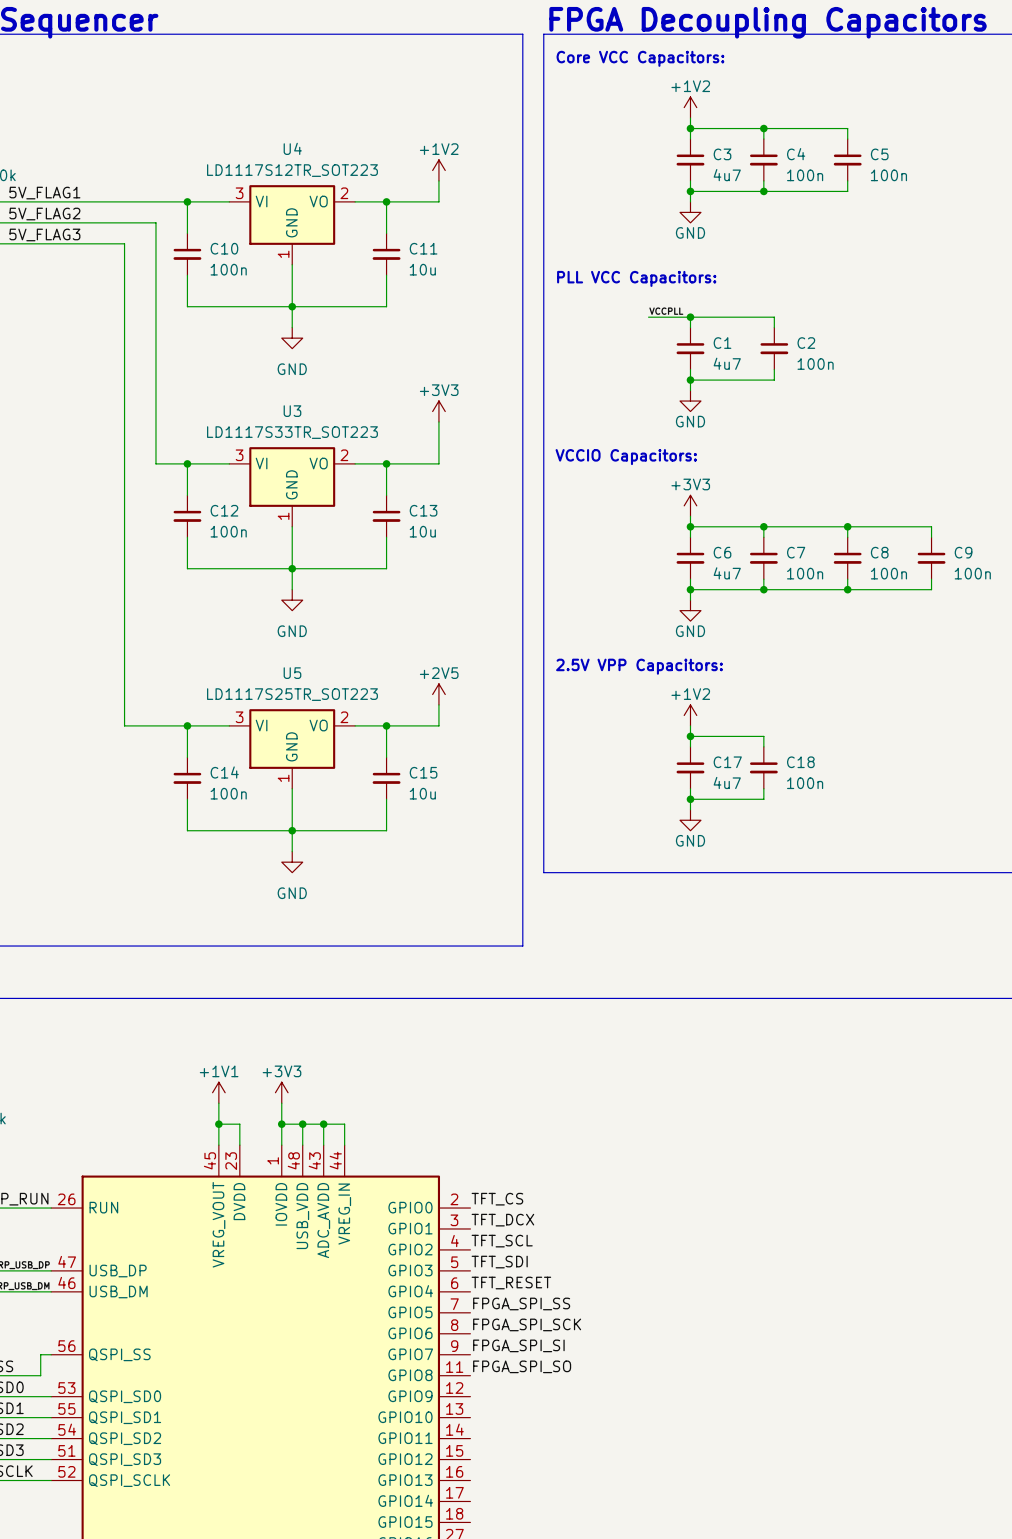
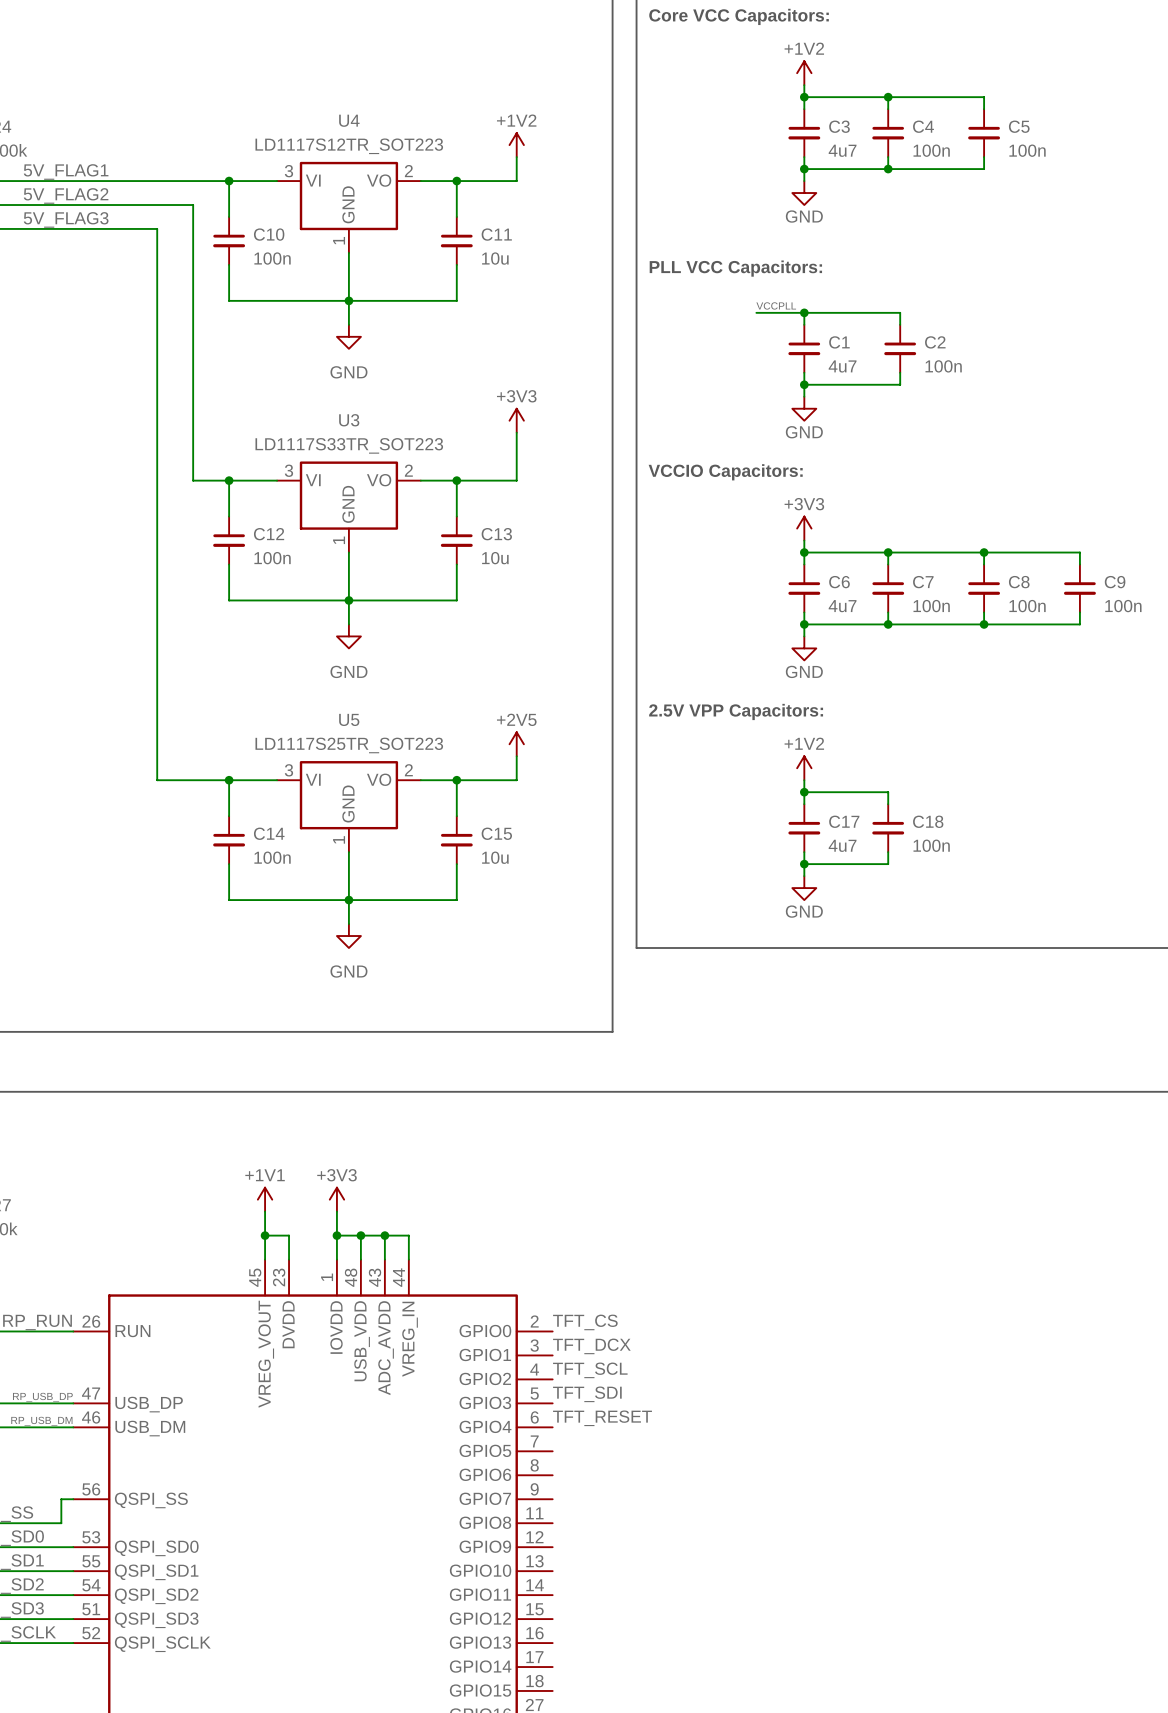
label: FPGA_SPI_SS (521, 1303) -> none
label: FPGA_SPI_SCK (527, 1324) -> none
label: FPGA_SPI_SI (518, 1345) -> none
label: FPGA_SPI_SO (522, 1366) -> none

